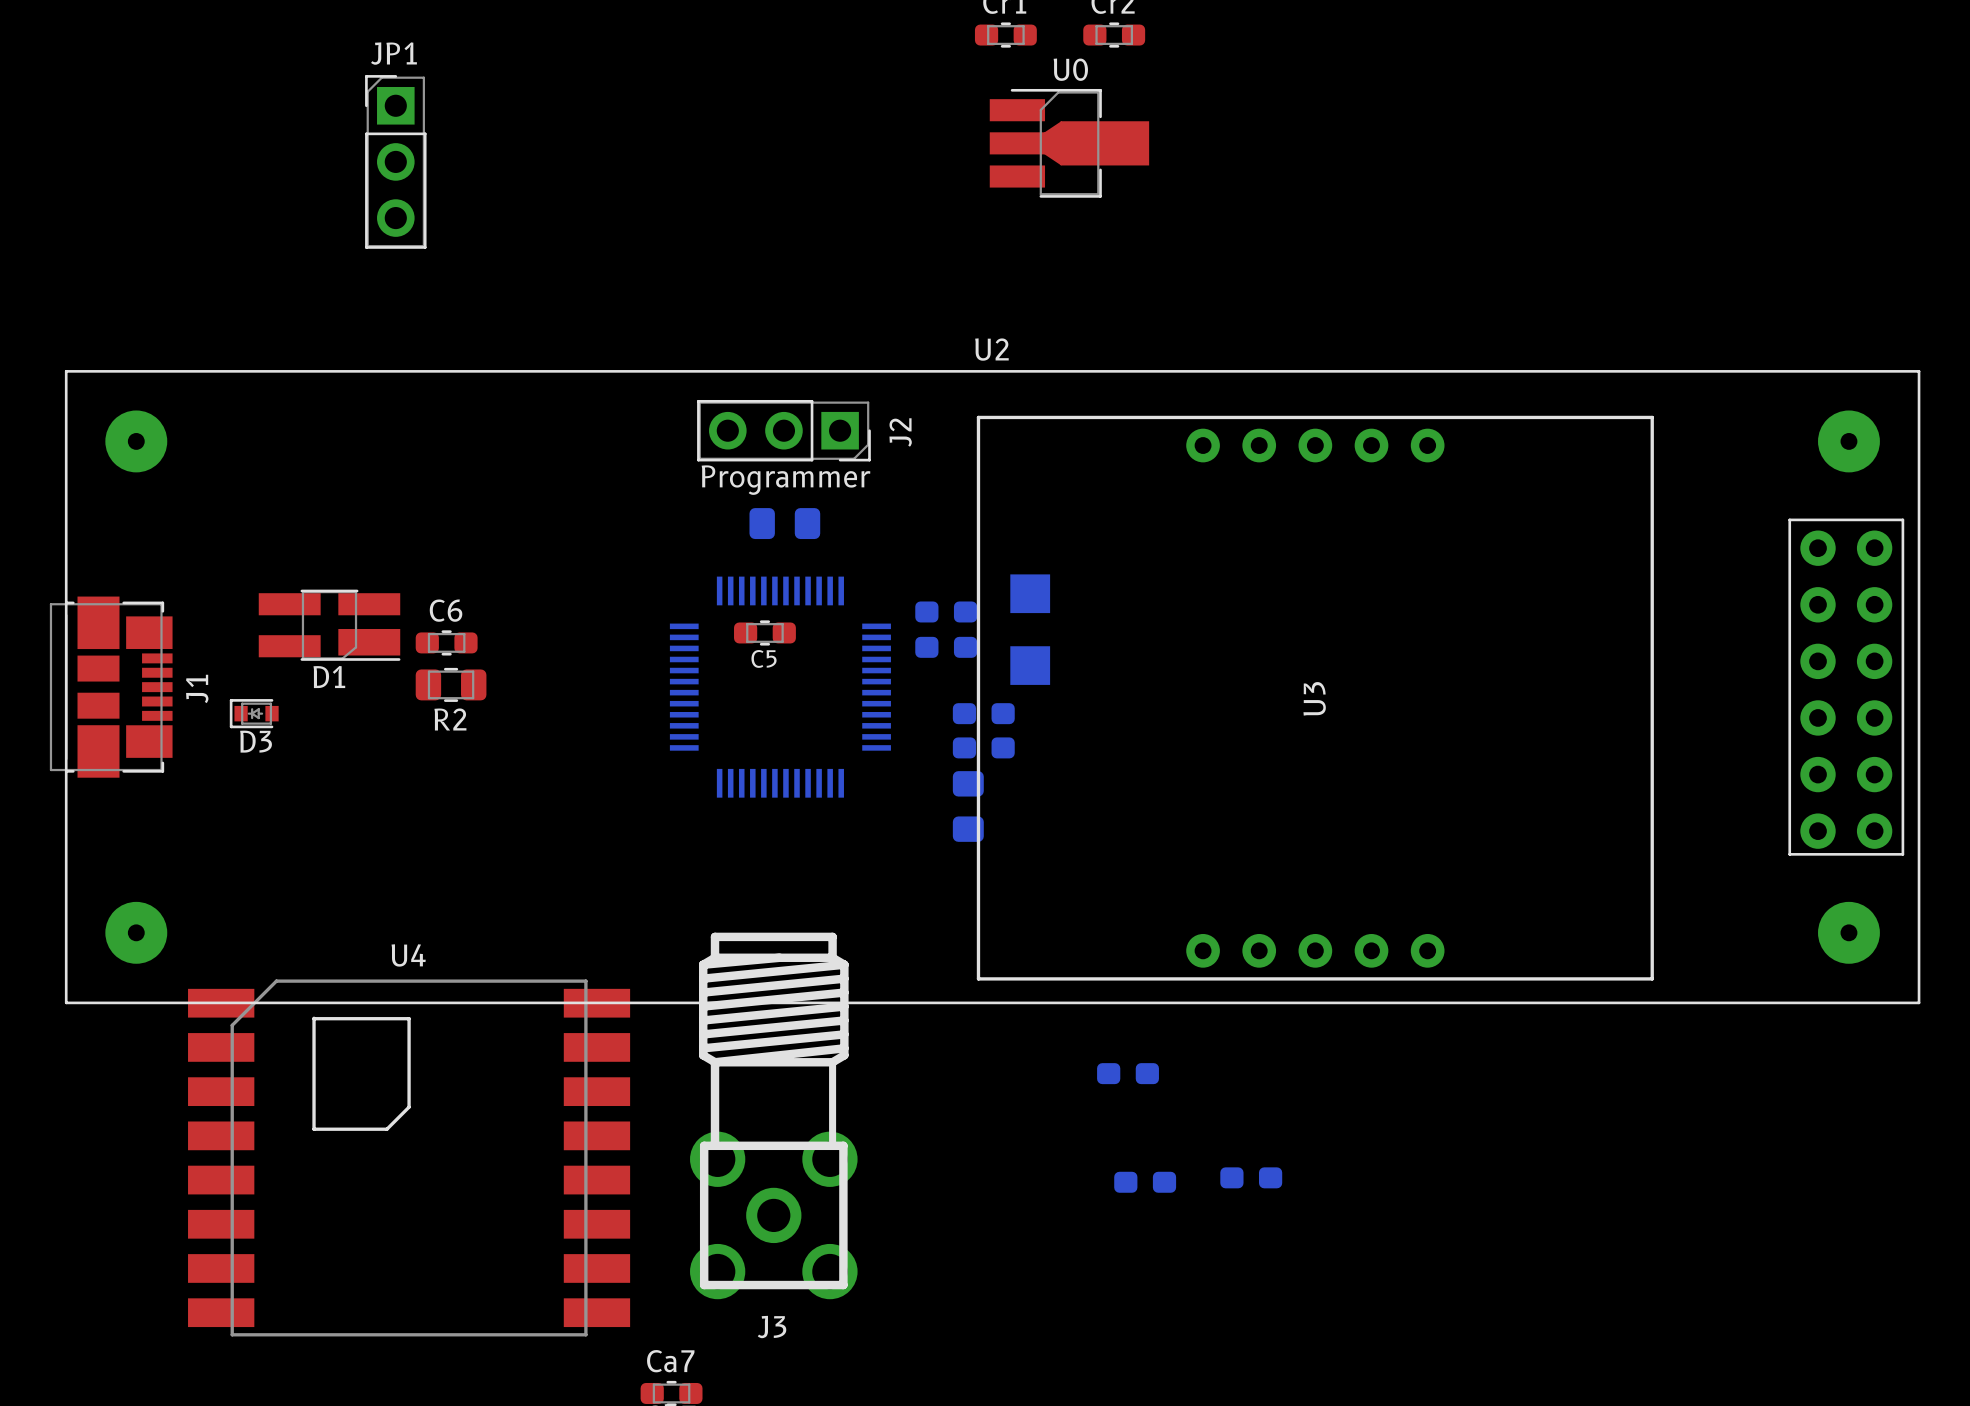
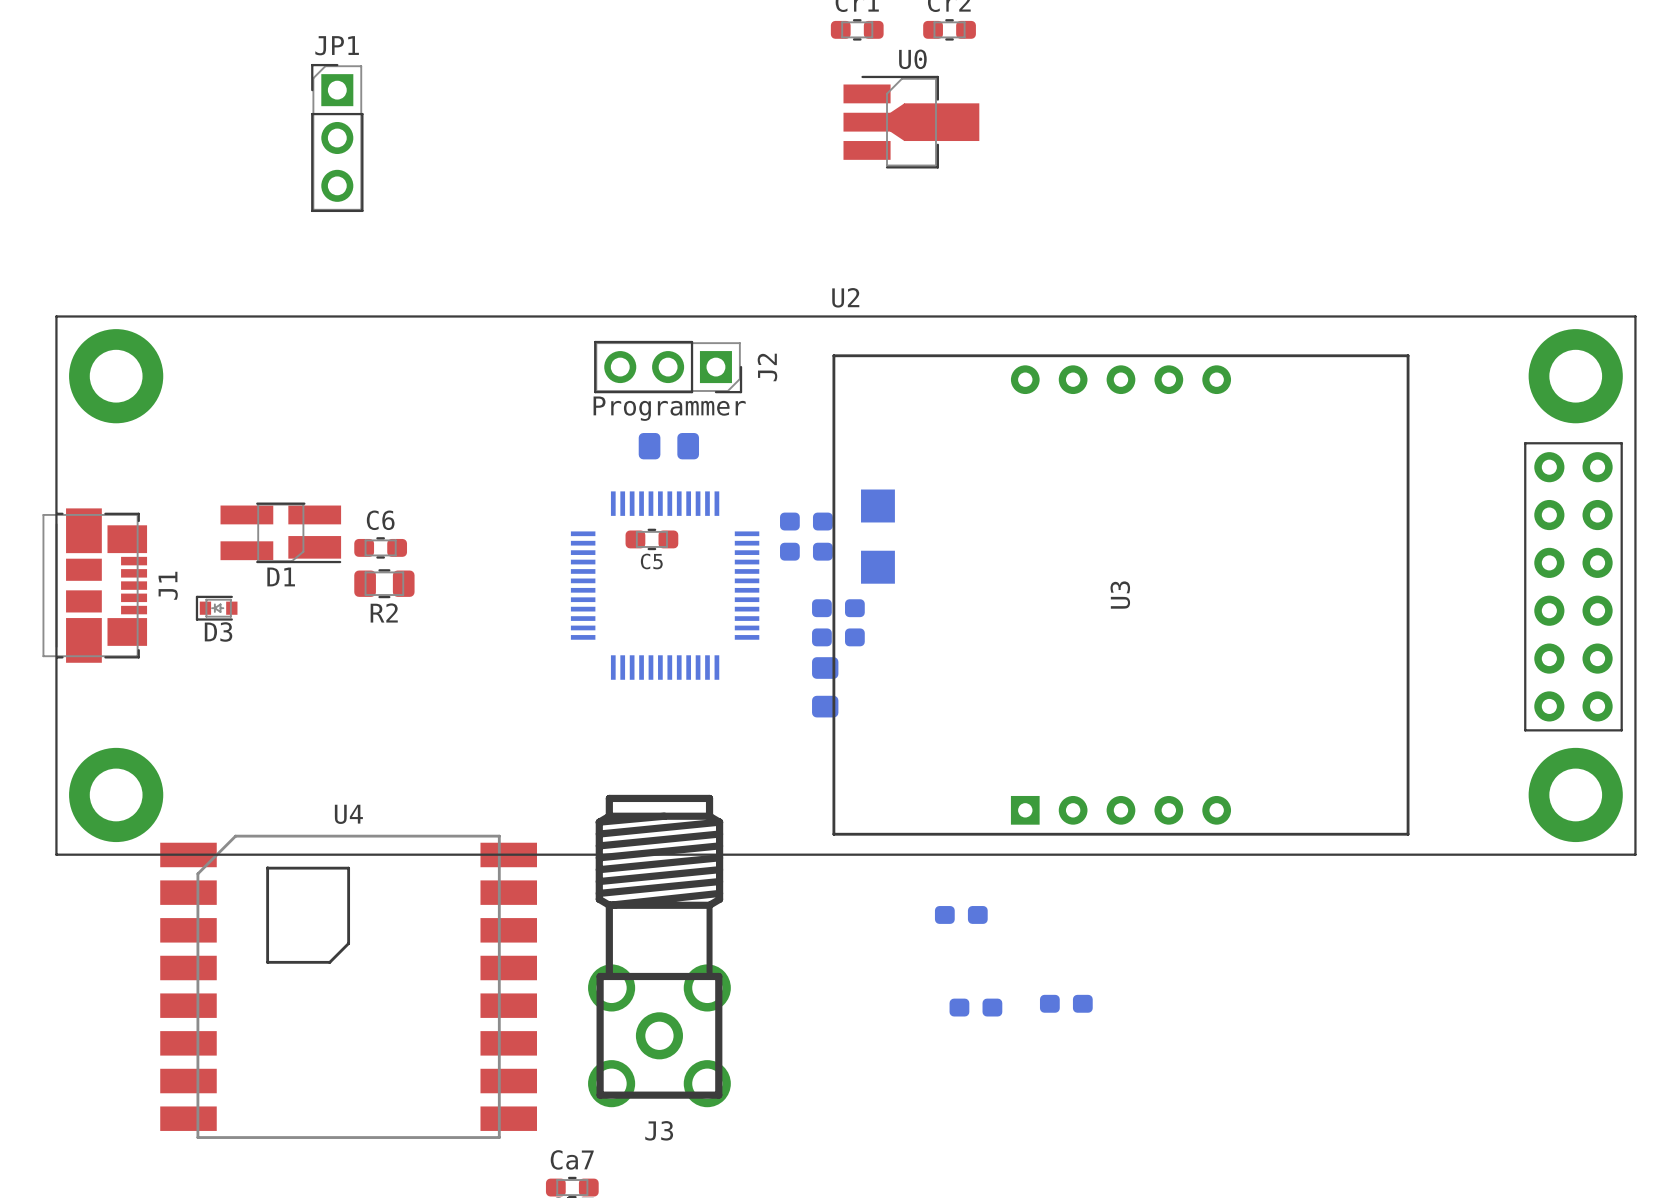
U2 footprint: [64, 370, 1921, 1005] -> [55, 315, 1637, 856]
U3 footprint: [976, 415, 1654, 981] -> [832, 354, 1410, 836]

